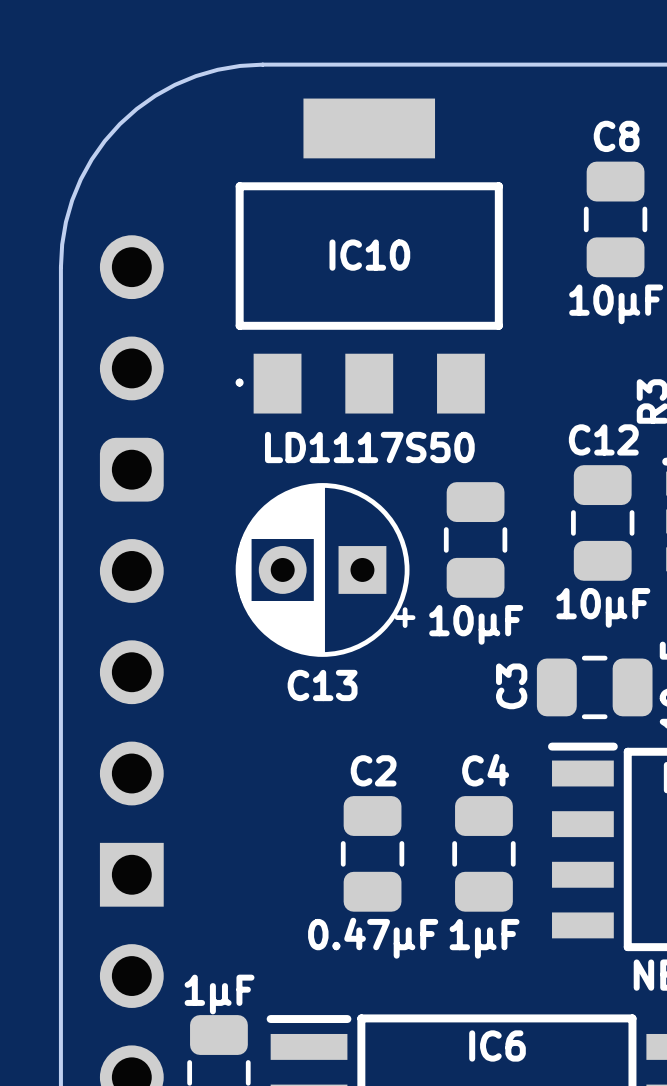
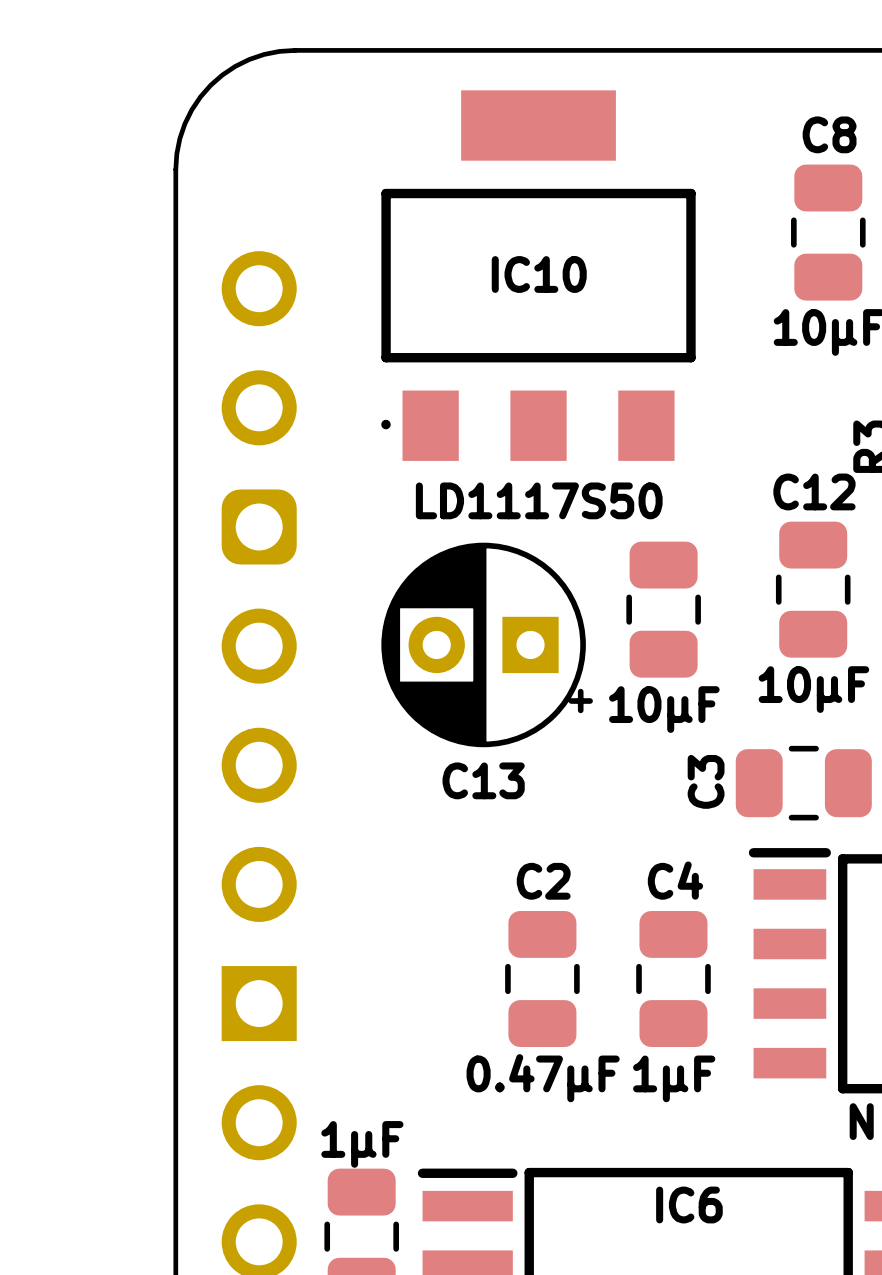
board edge: (262, 64) (240, 65) (196, 76) (155, 95) (119, 124) (91, 159) (72, 200) (62, 244) (60, 267) -> (413, 50) (279, 51) (264, 54) (235, 66) (210, 85) (191, 109) (179, 138) (176, 154) (175, 288)

